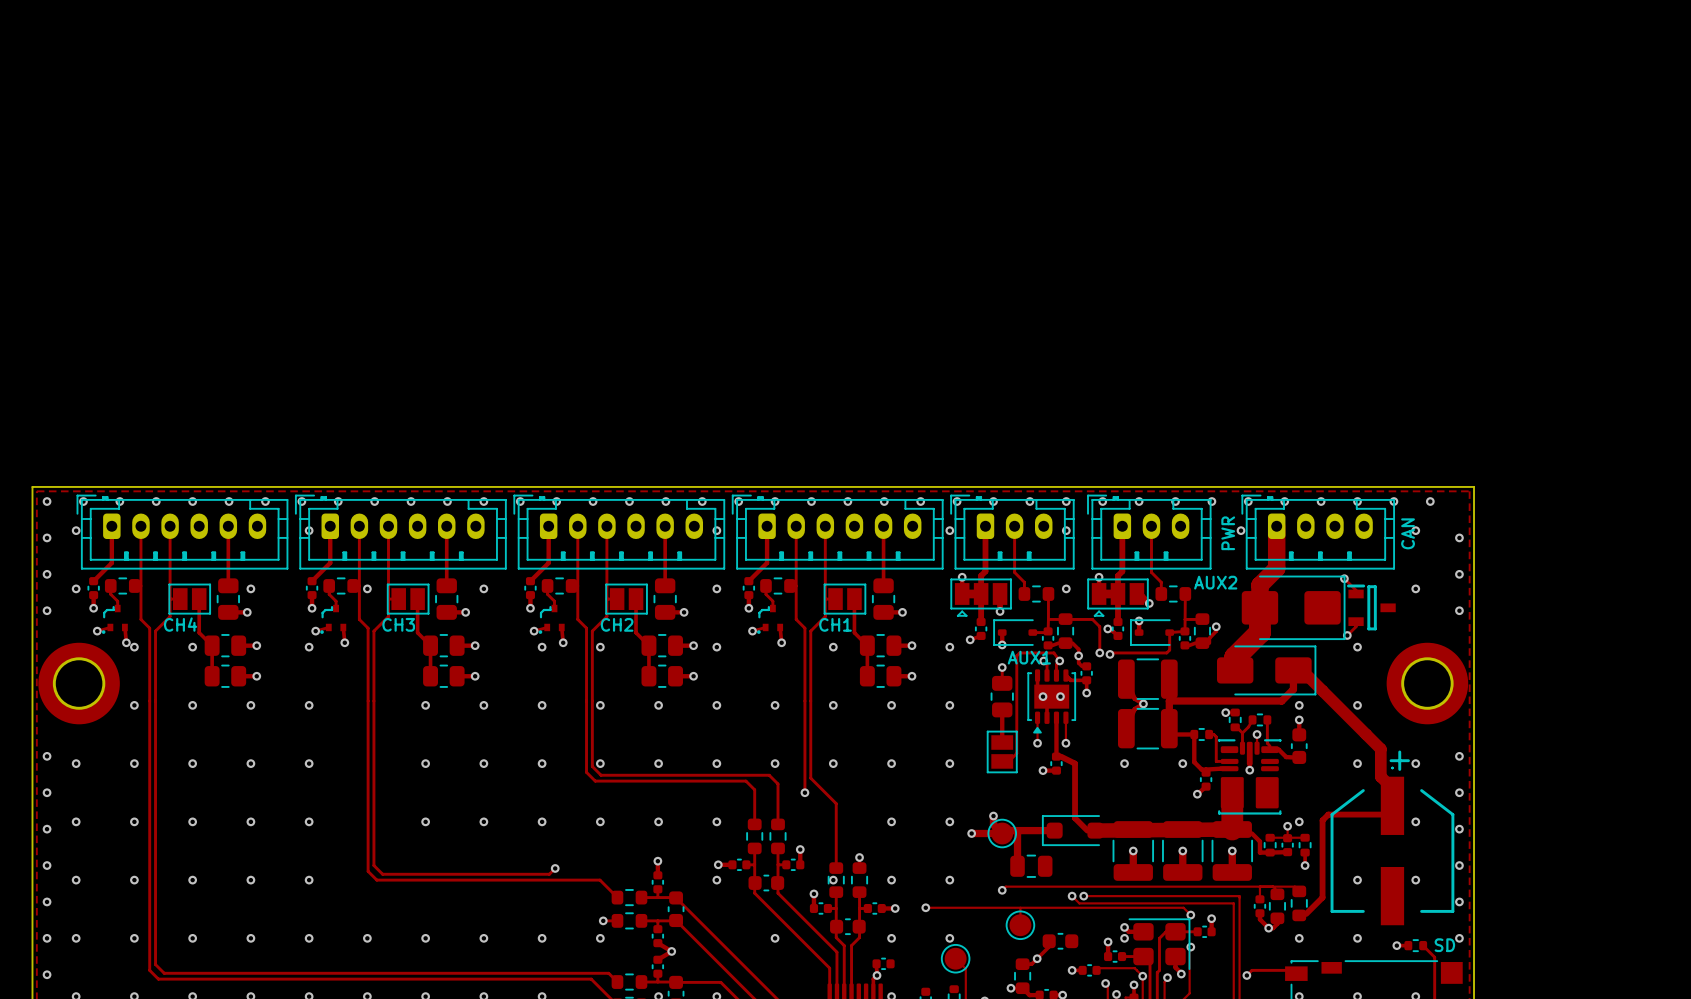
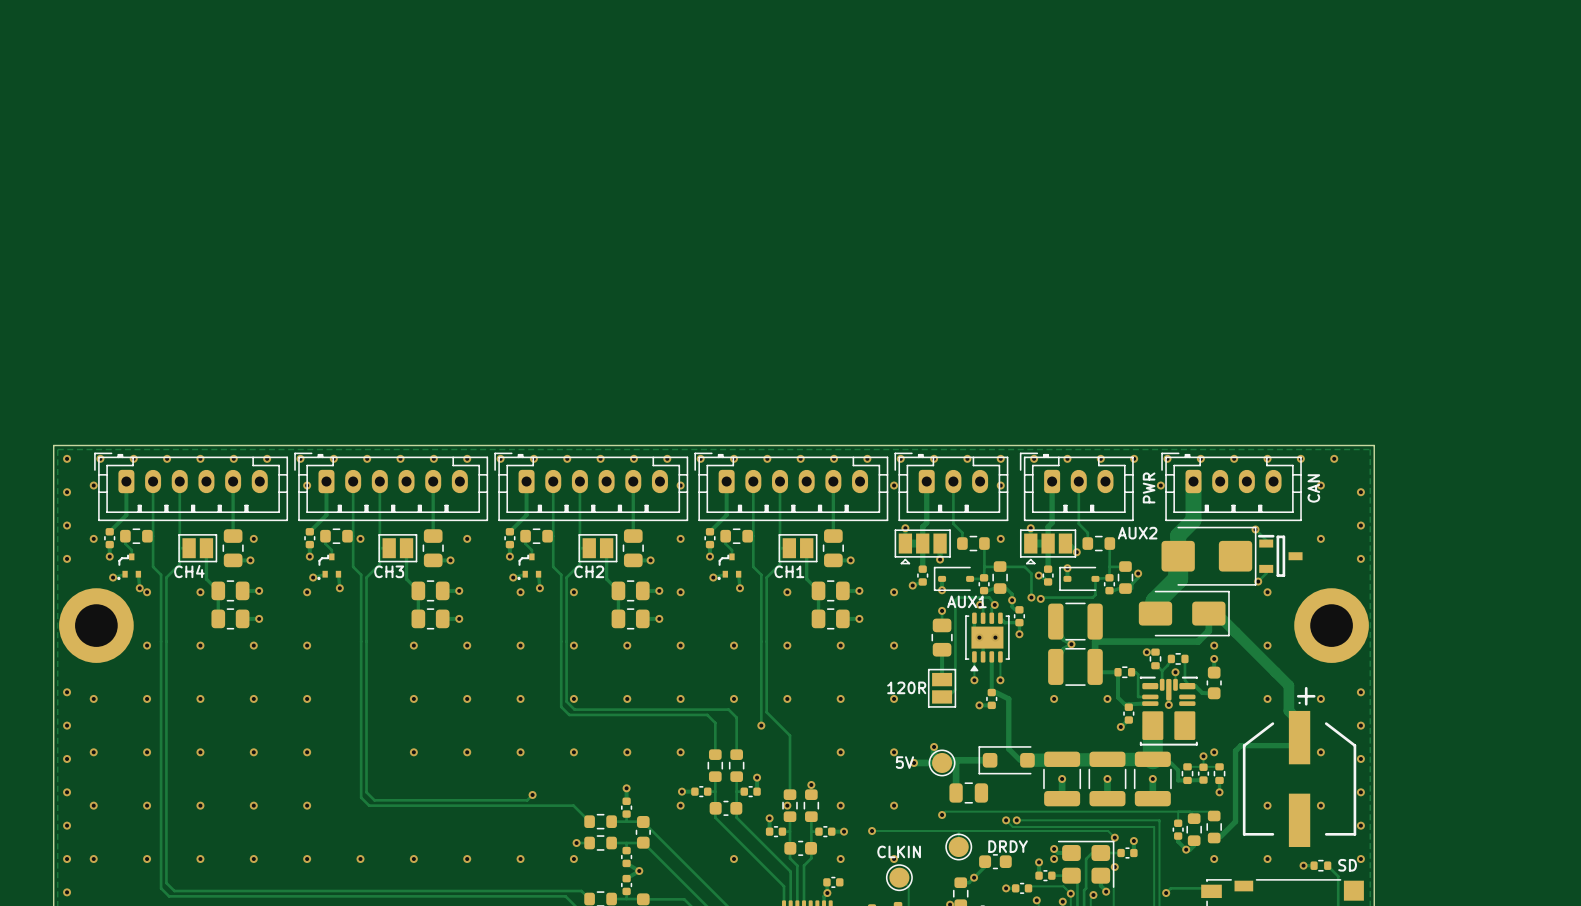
text: none -> 120R (906, 687)
text: none -> 5V (904, 762)
text: none -> DRDY (1008, 846)
text: none -> CLKIN (899, 851)

